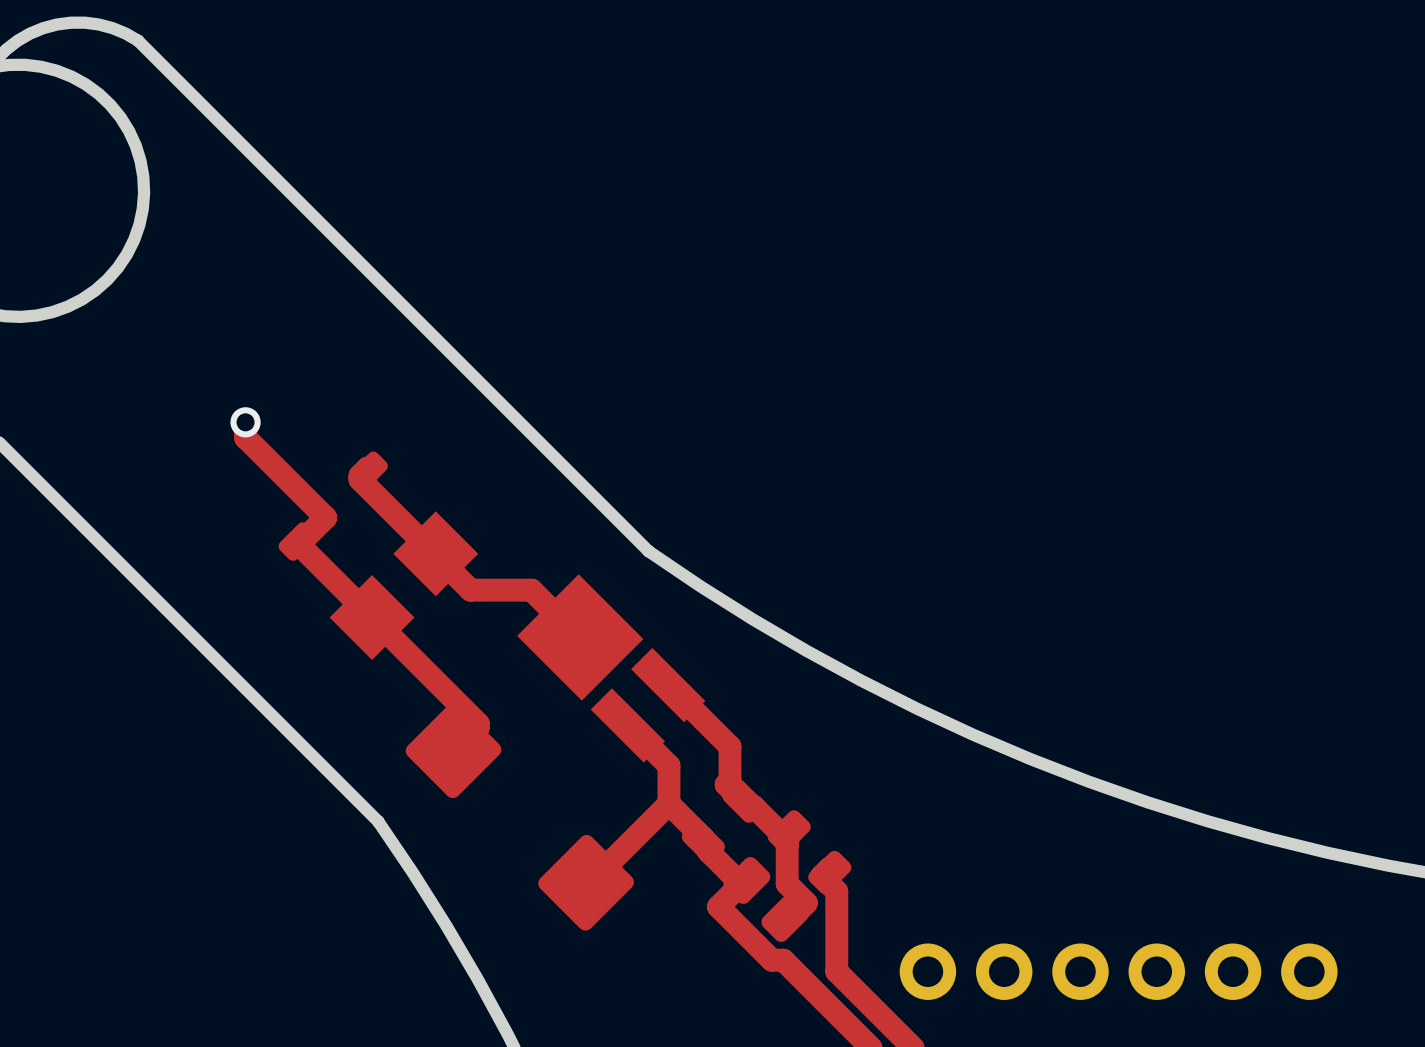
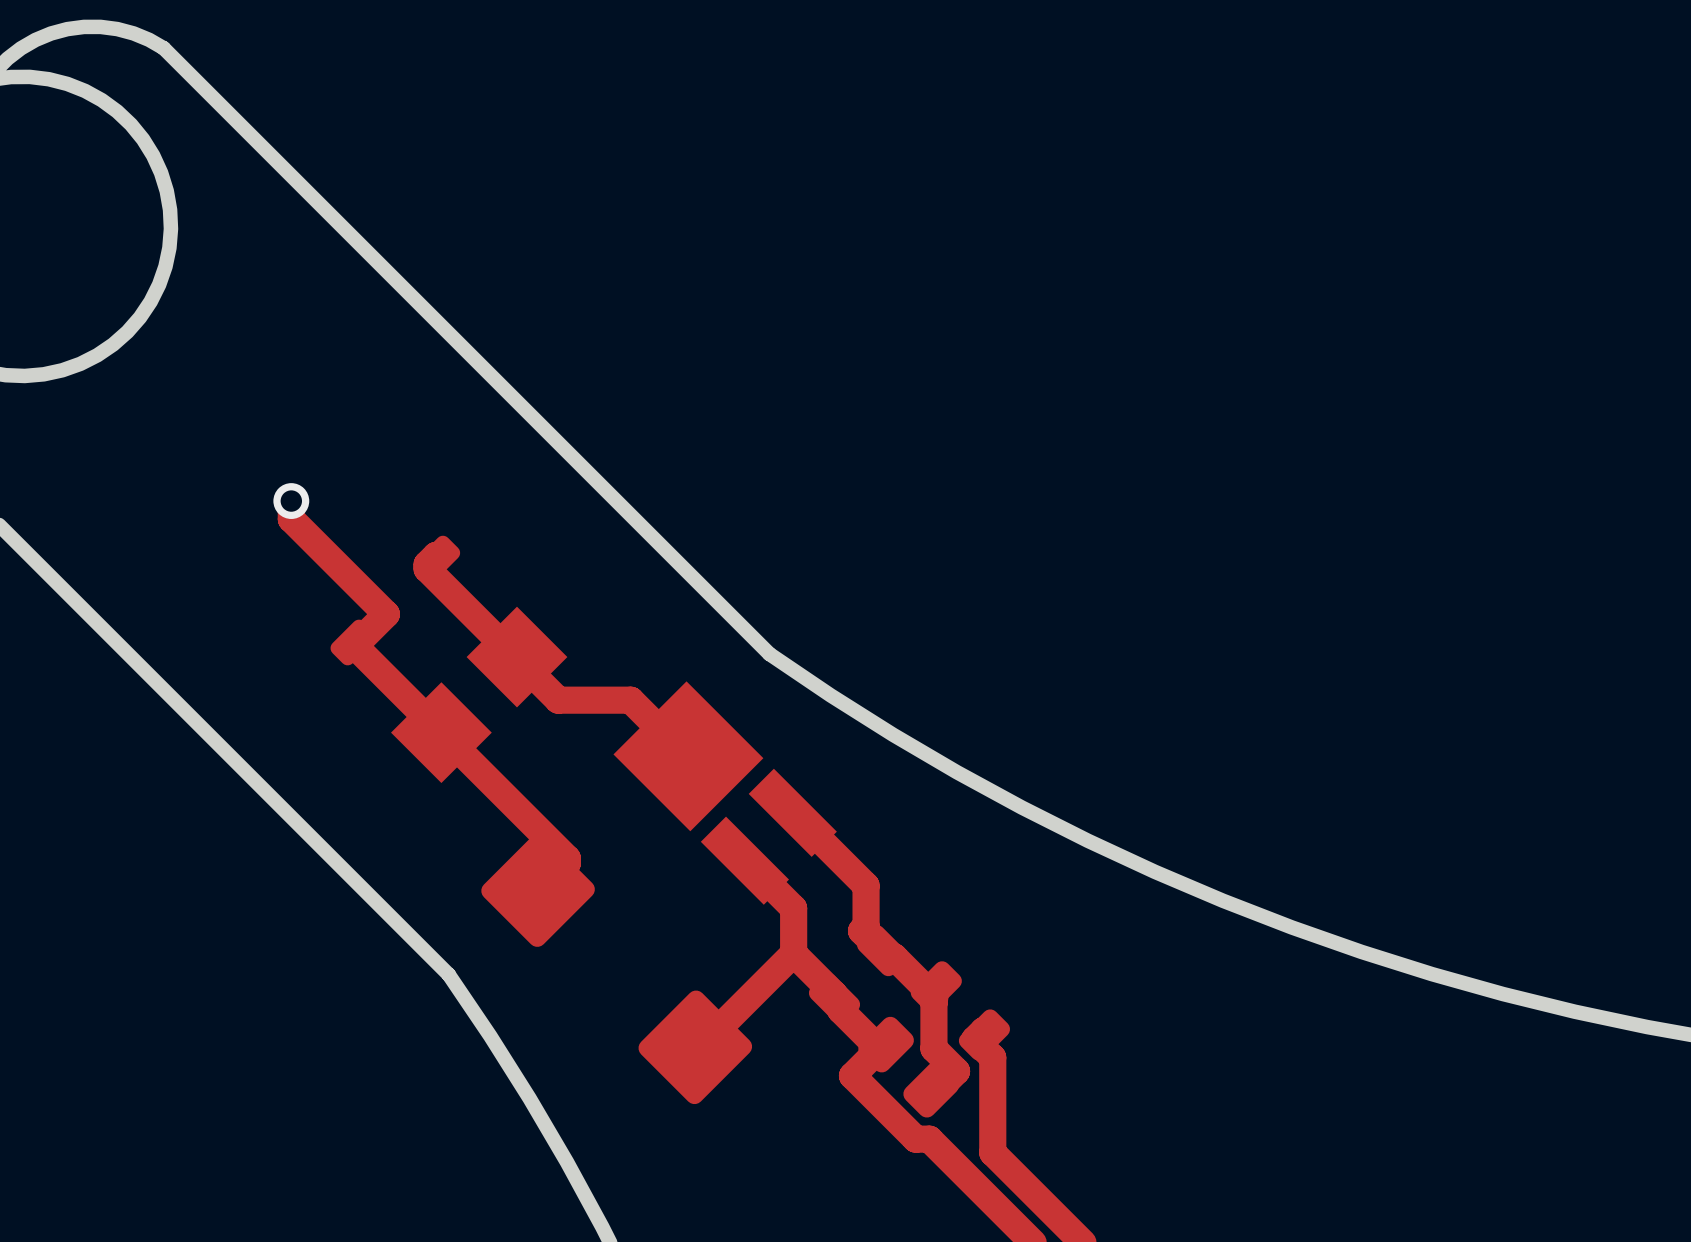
part: (1118, 971) -> none

